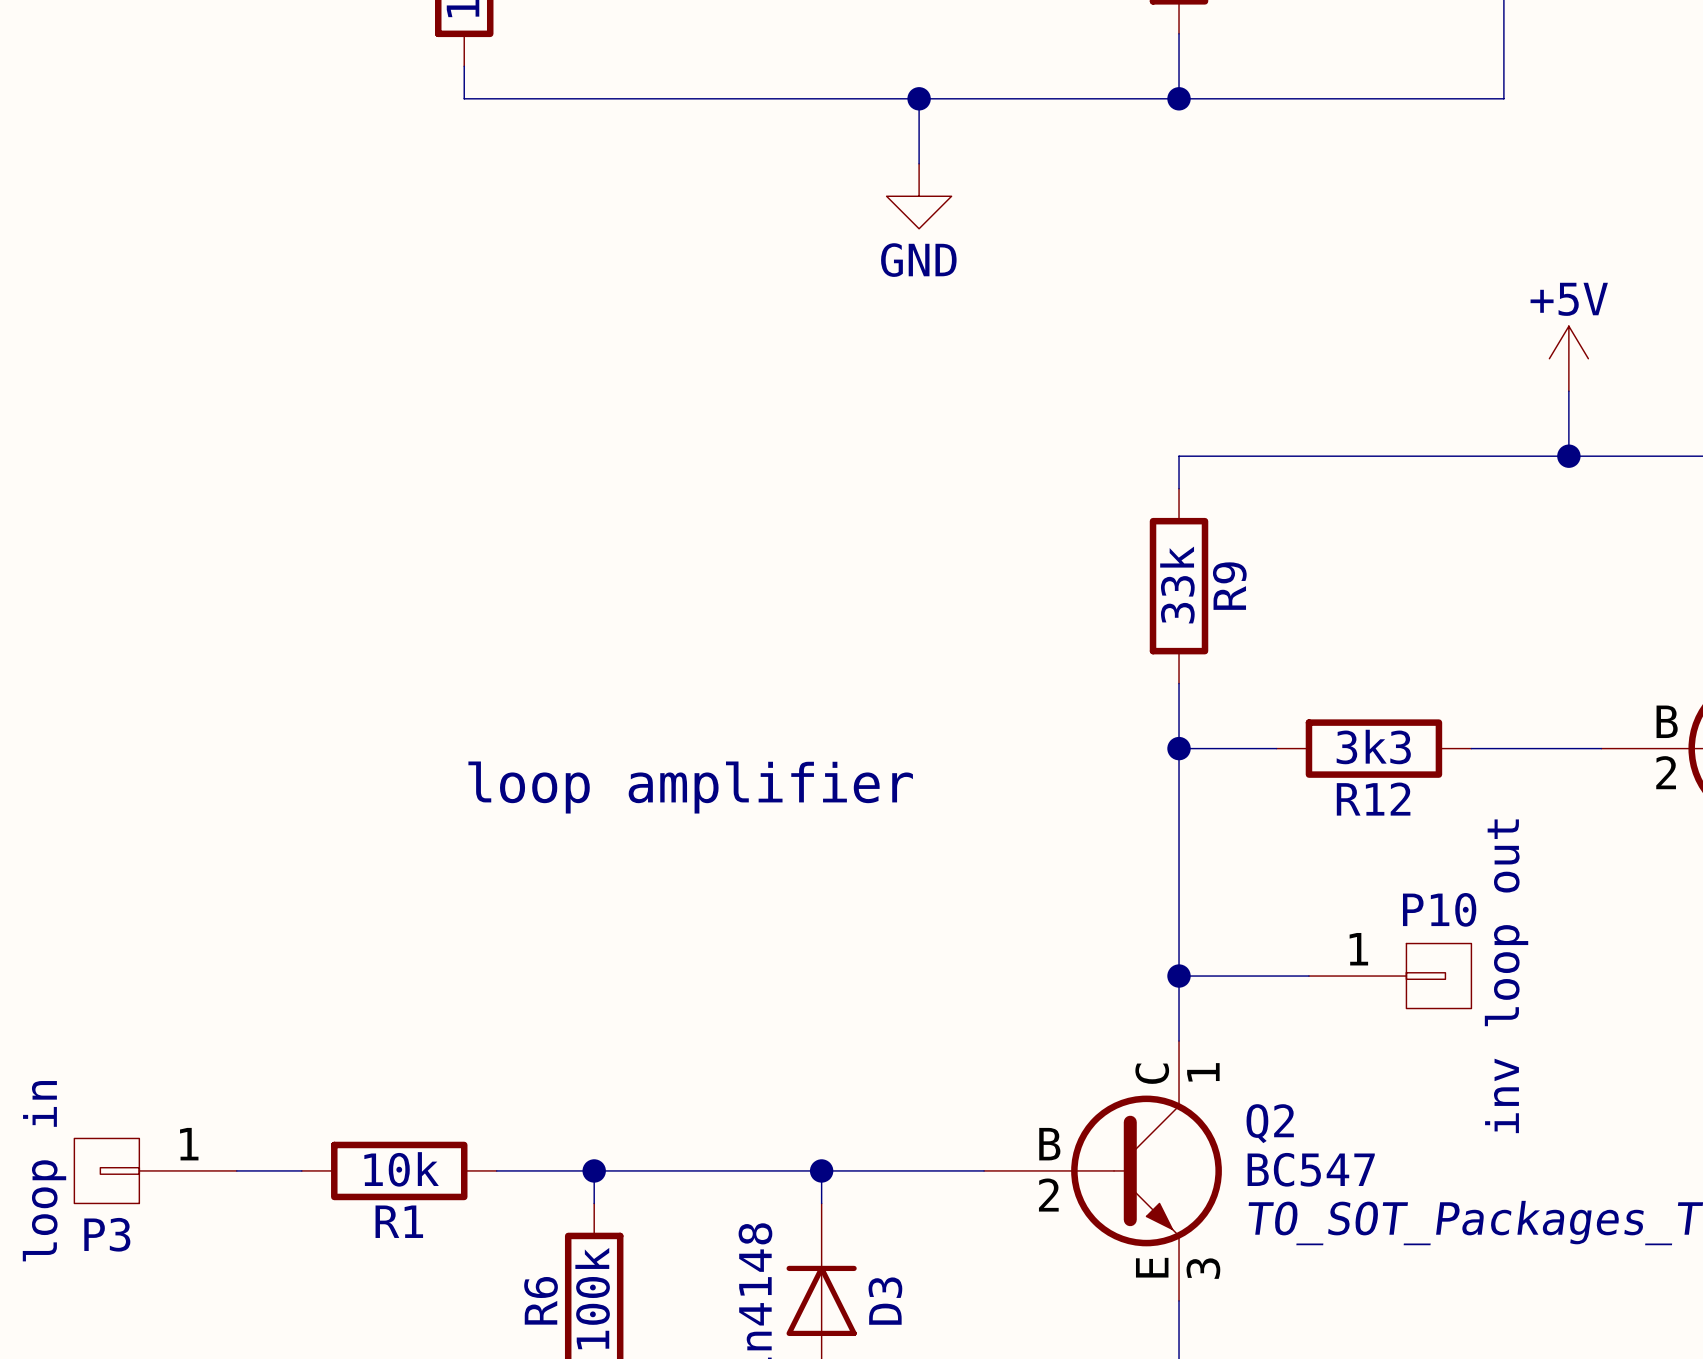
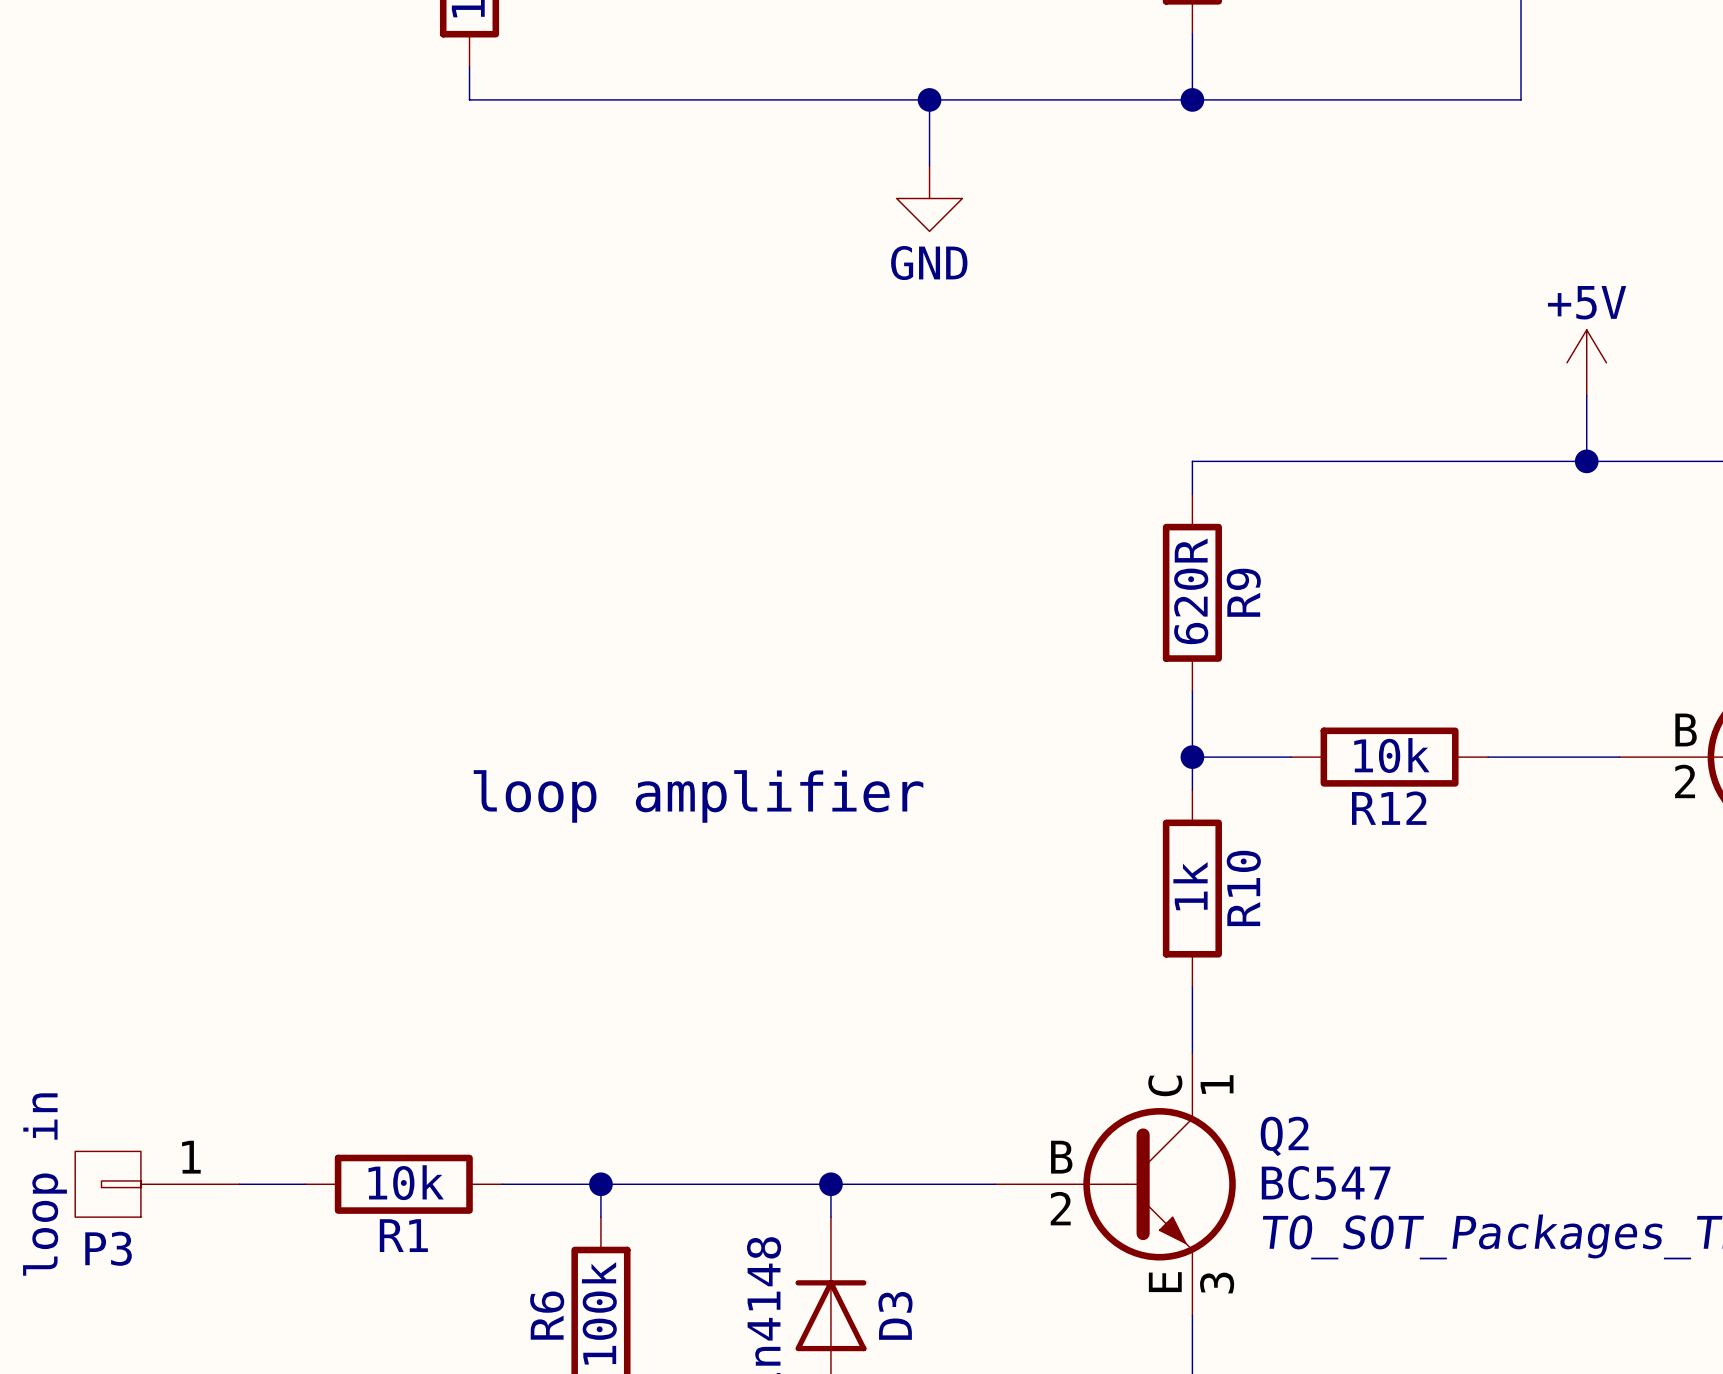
R9 value: 33k (1177, 585) -> 620R (1191, 591)
R12 value: 3k3 (1373, 747) -> 10k (1391, 755)
wire: (1179, 781) (1179, 976) (1308, 976) -> none
R10: none -> 1k (1192, 888)
junction: (1179, 976) -> none
P10: inv loop out (1390, 976) -> none

